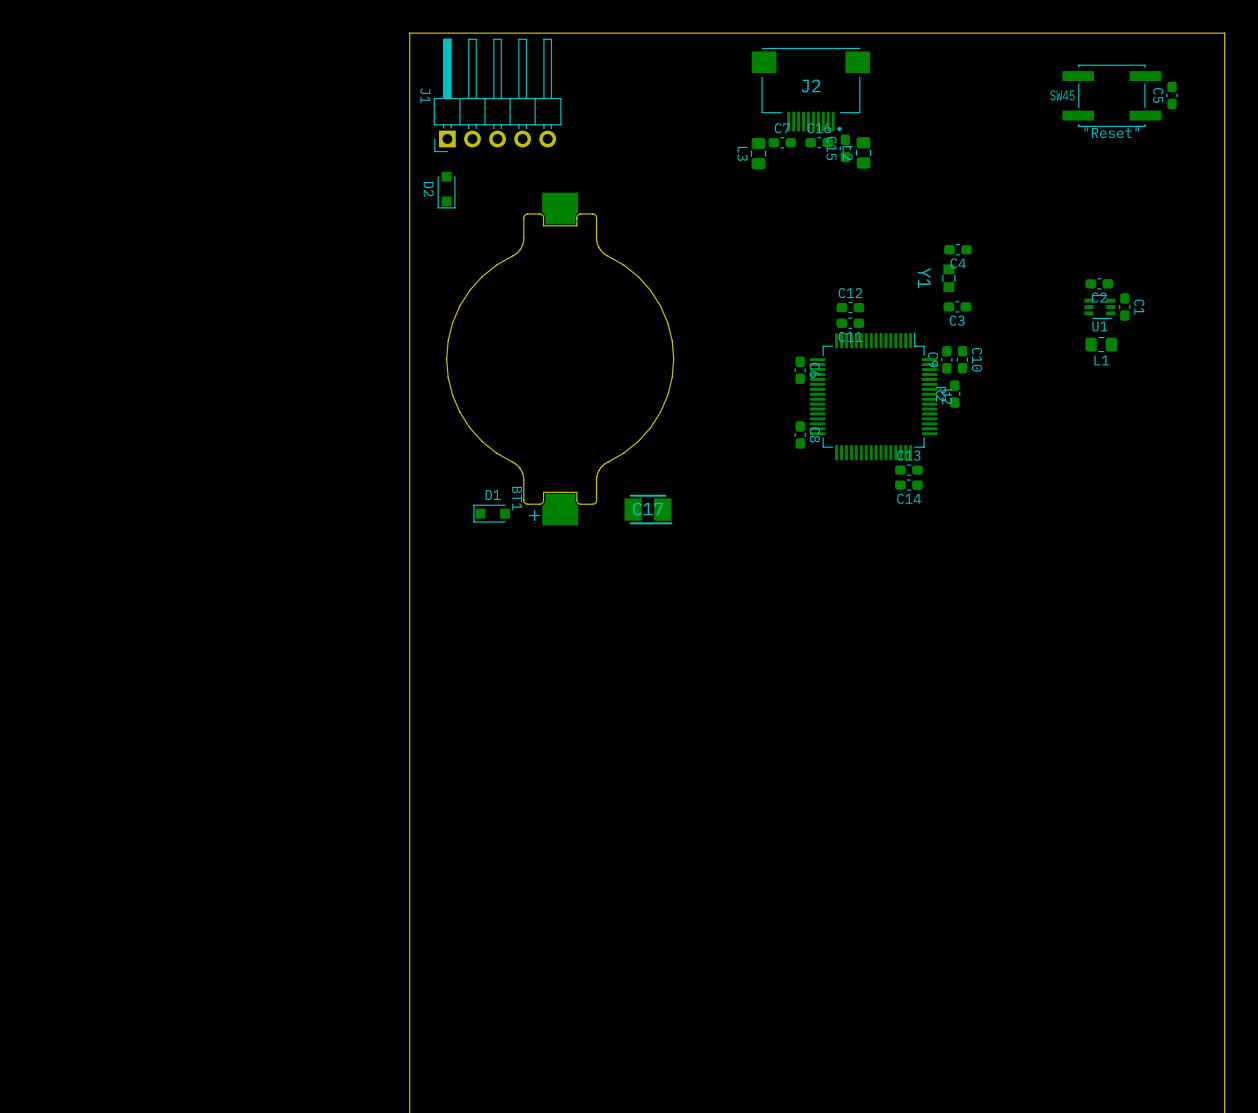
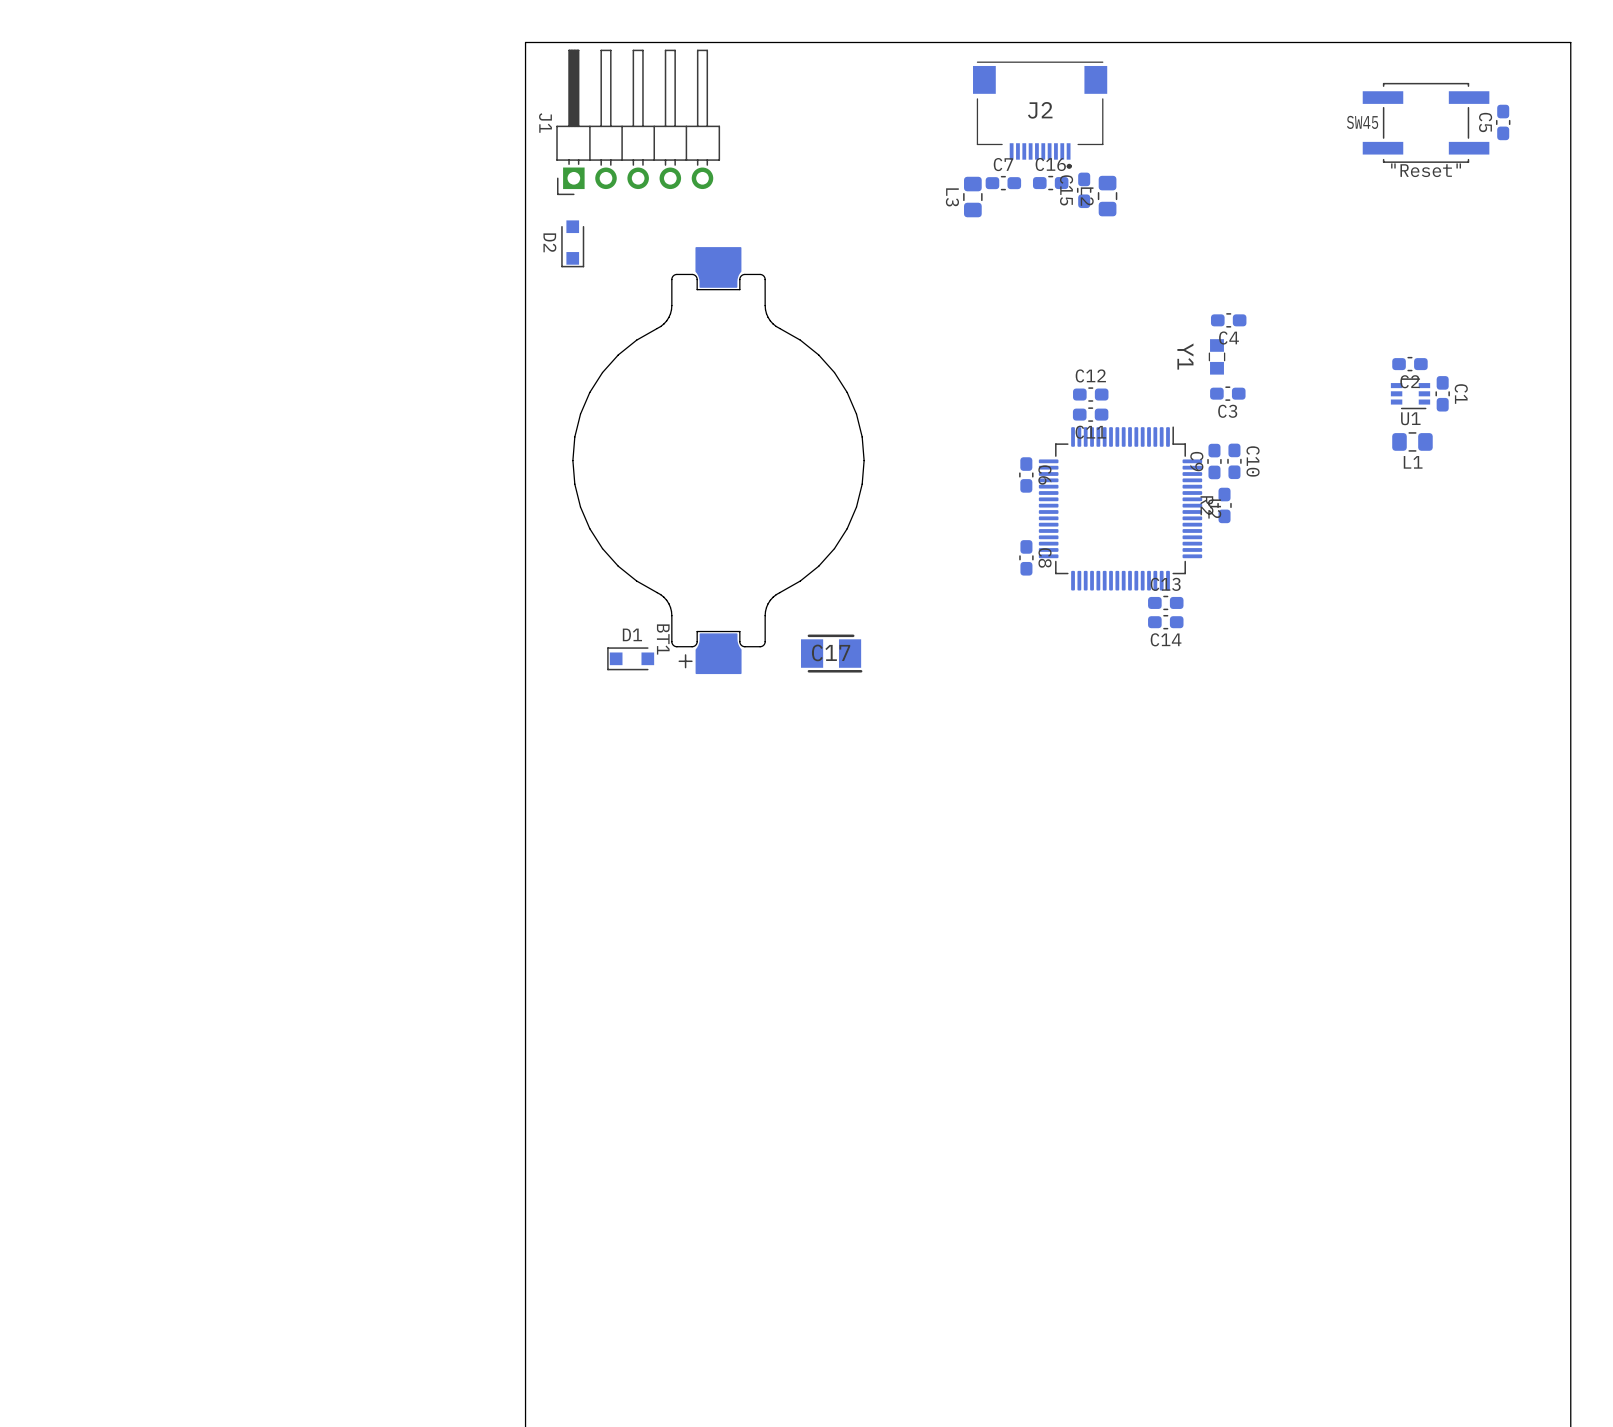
J2 footprint: [751, 47, 871, 132] -> [973, 61, 1108, 169]

